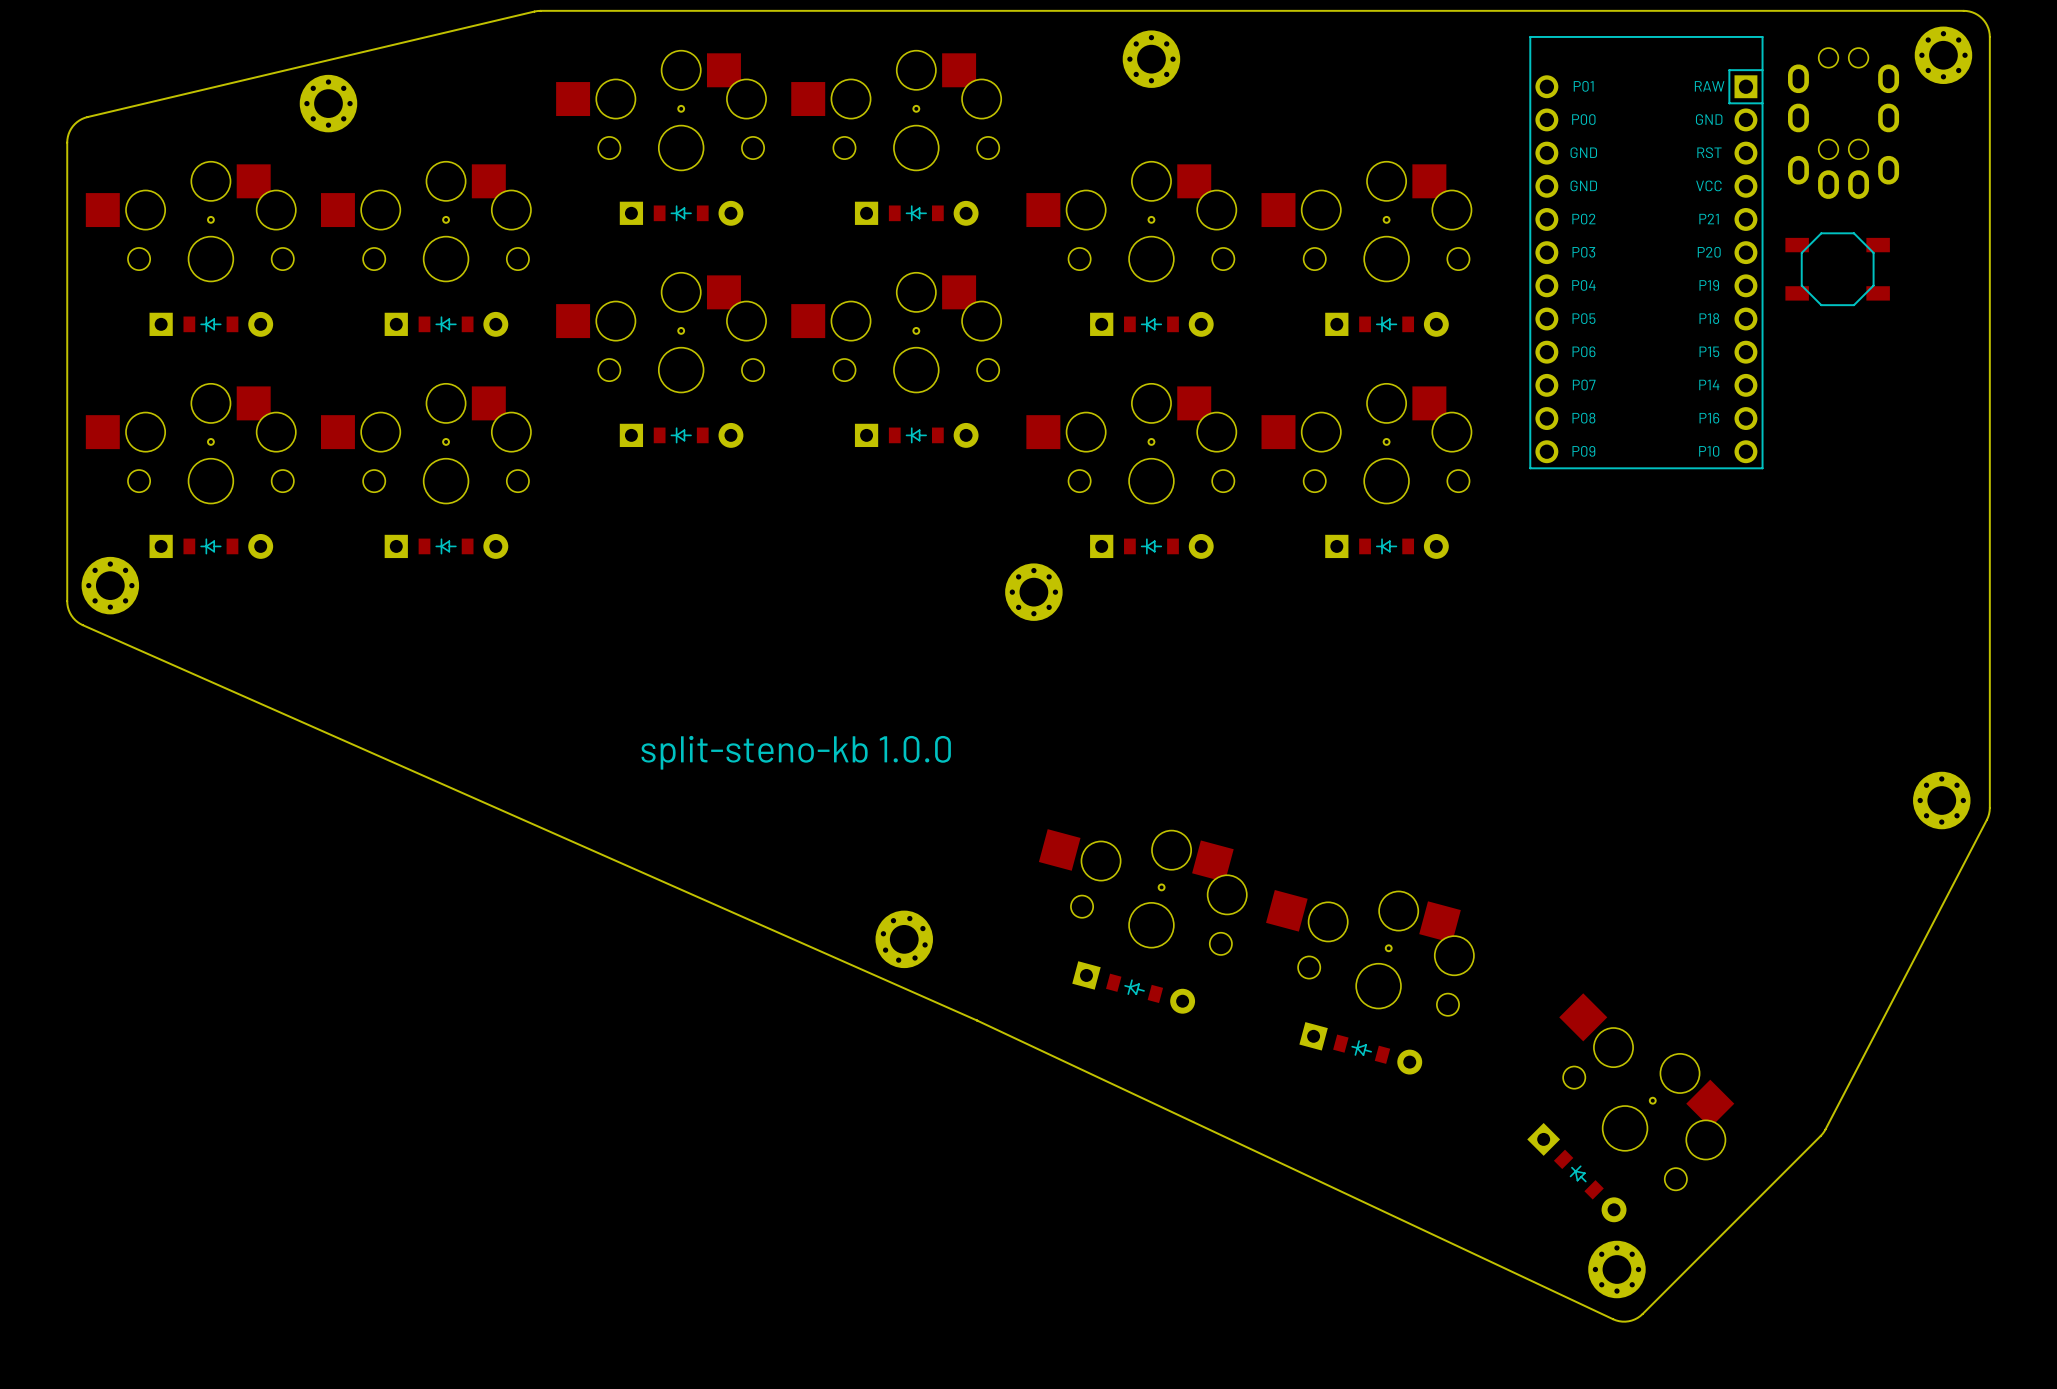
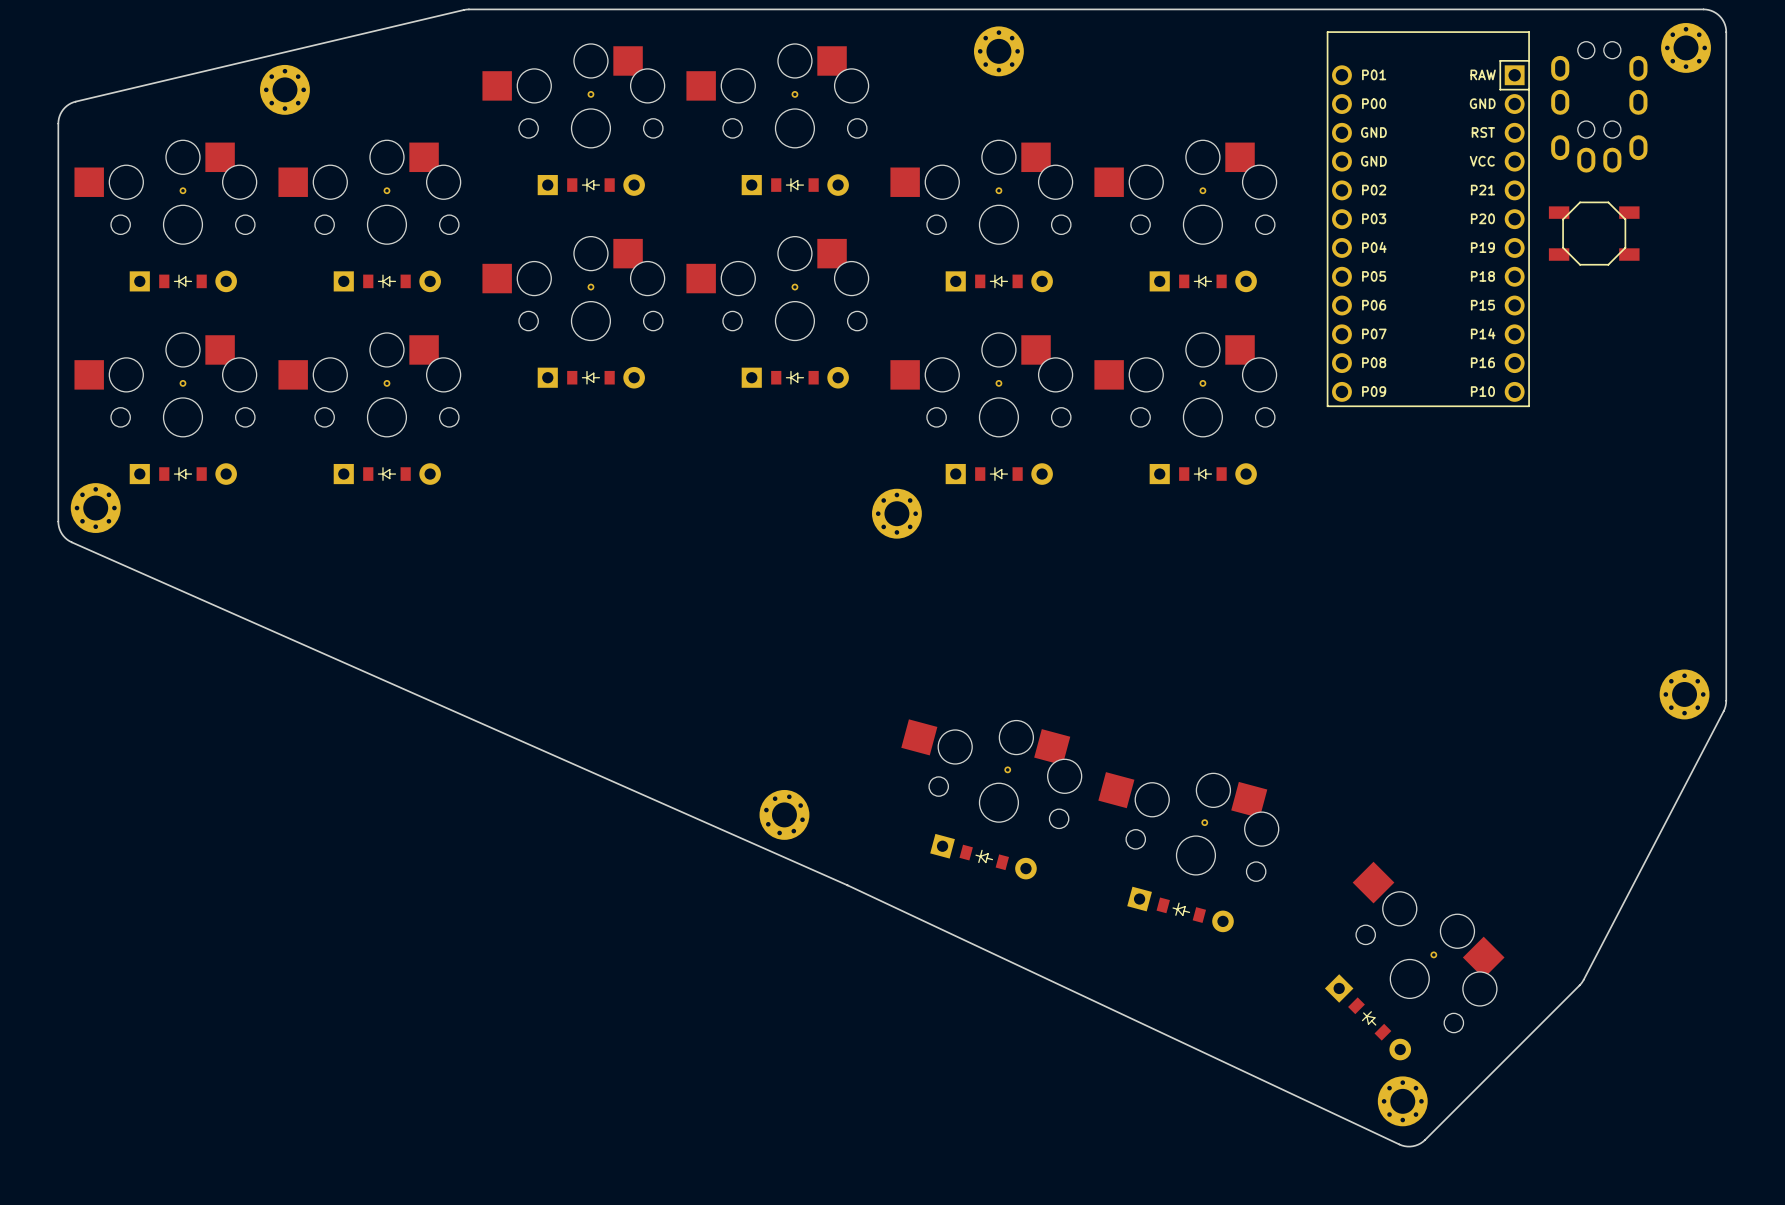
text: split-steno-kb 1.0.0 (796, 752) -> none

